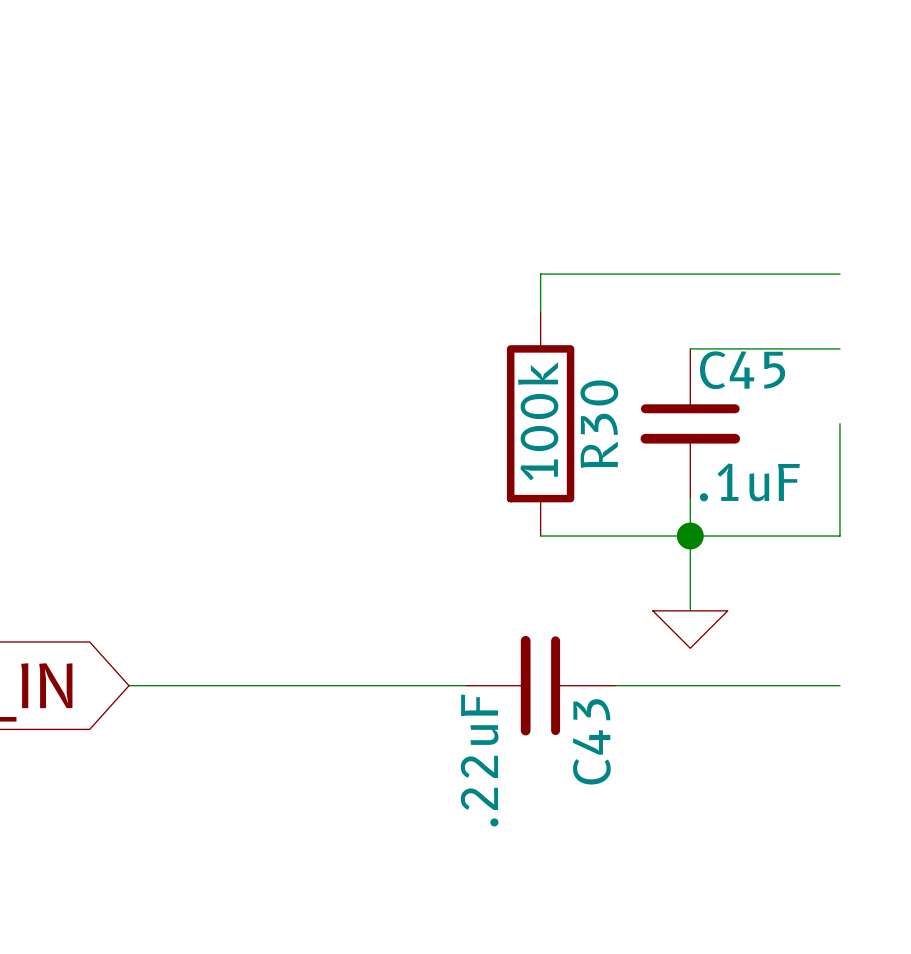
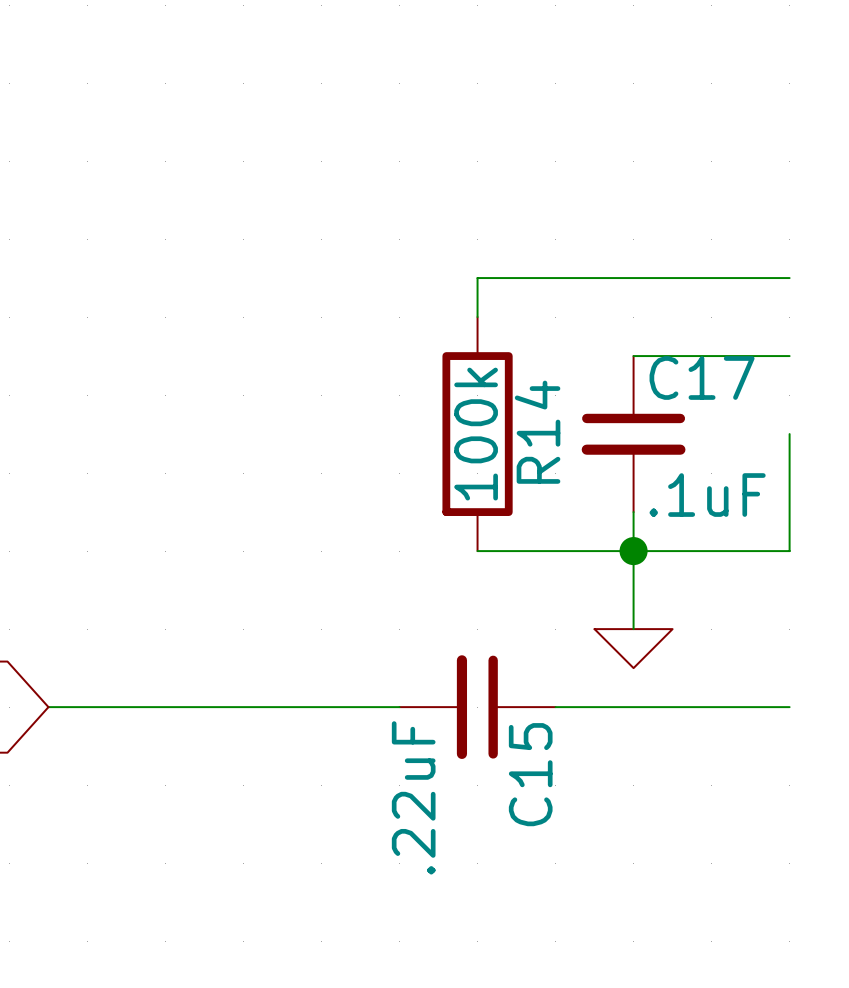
C45 name: C45 (742, 370) -> C17 (702, 378)
R30 name: R30 (599, 424) -> R14 (537, 432)
C43 name: C43 (591, 741) -> C15 (530, 774)

